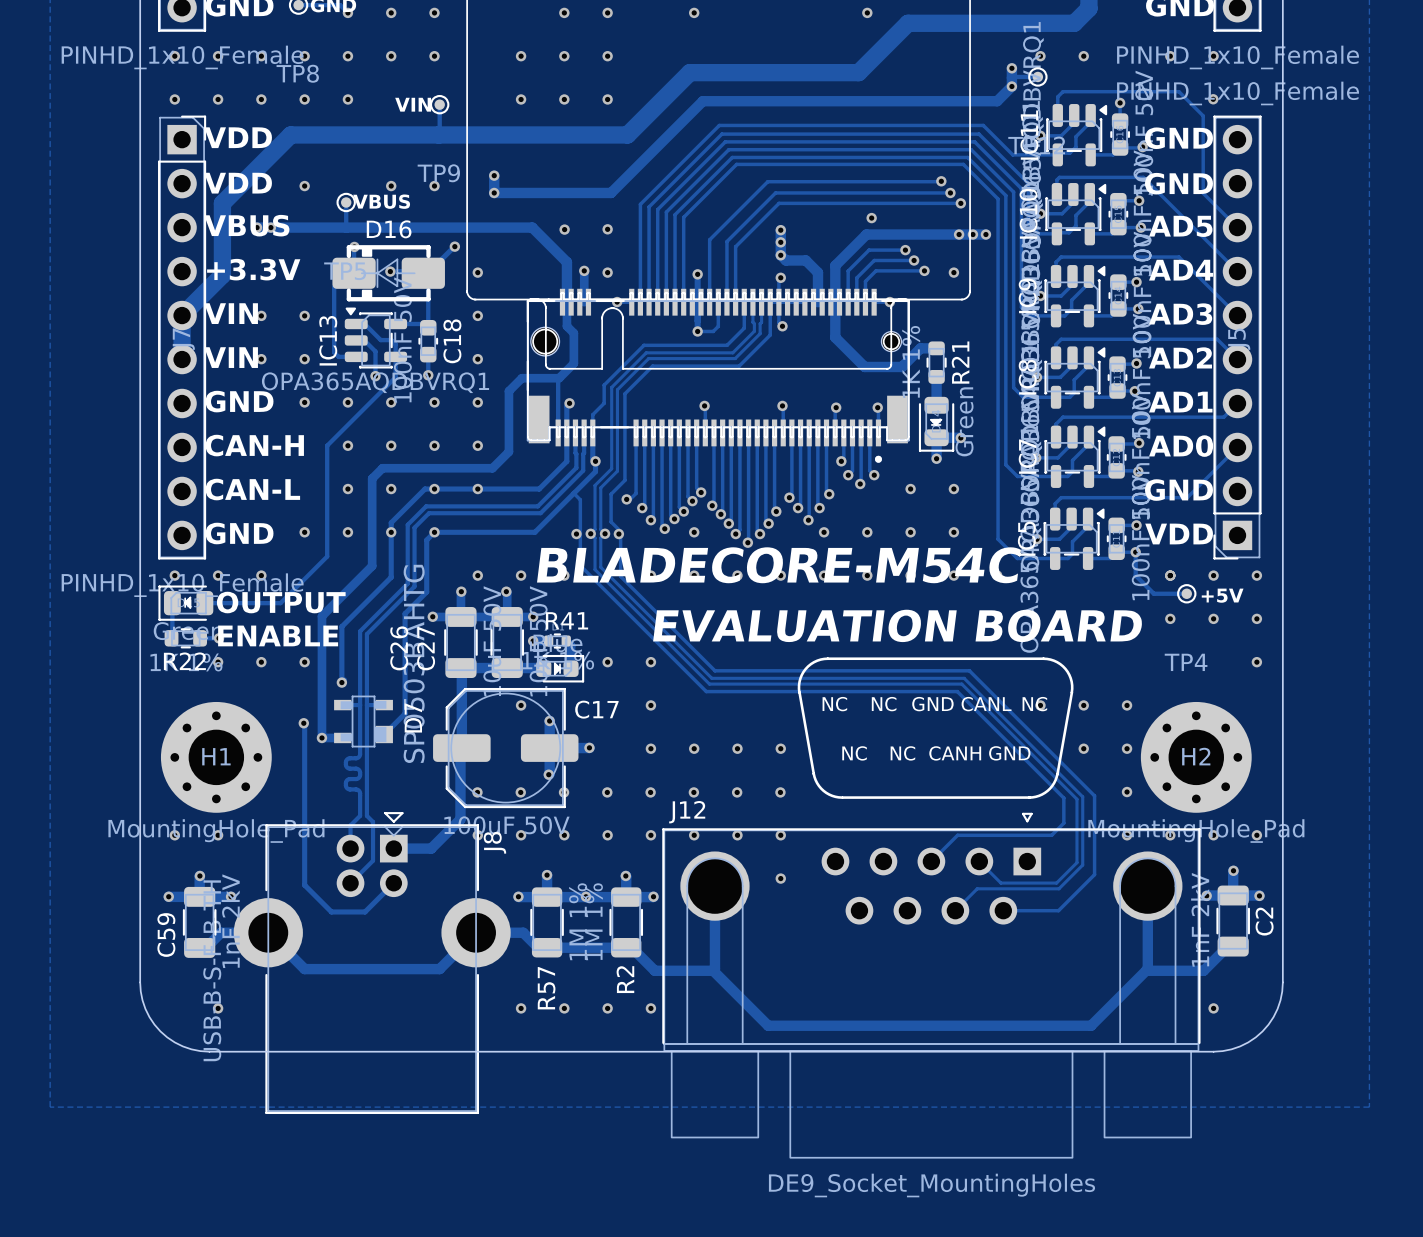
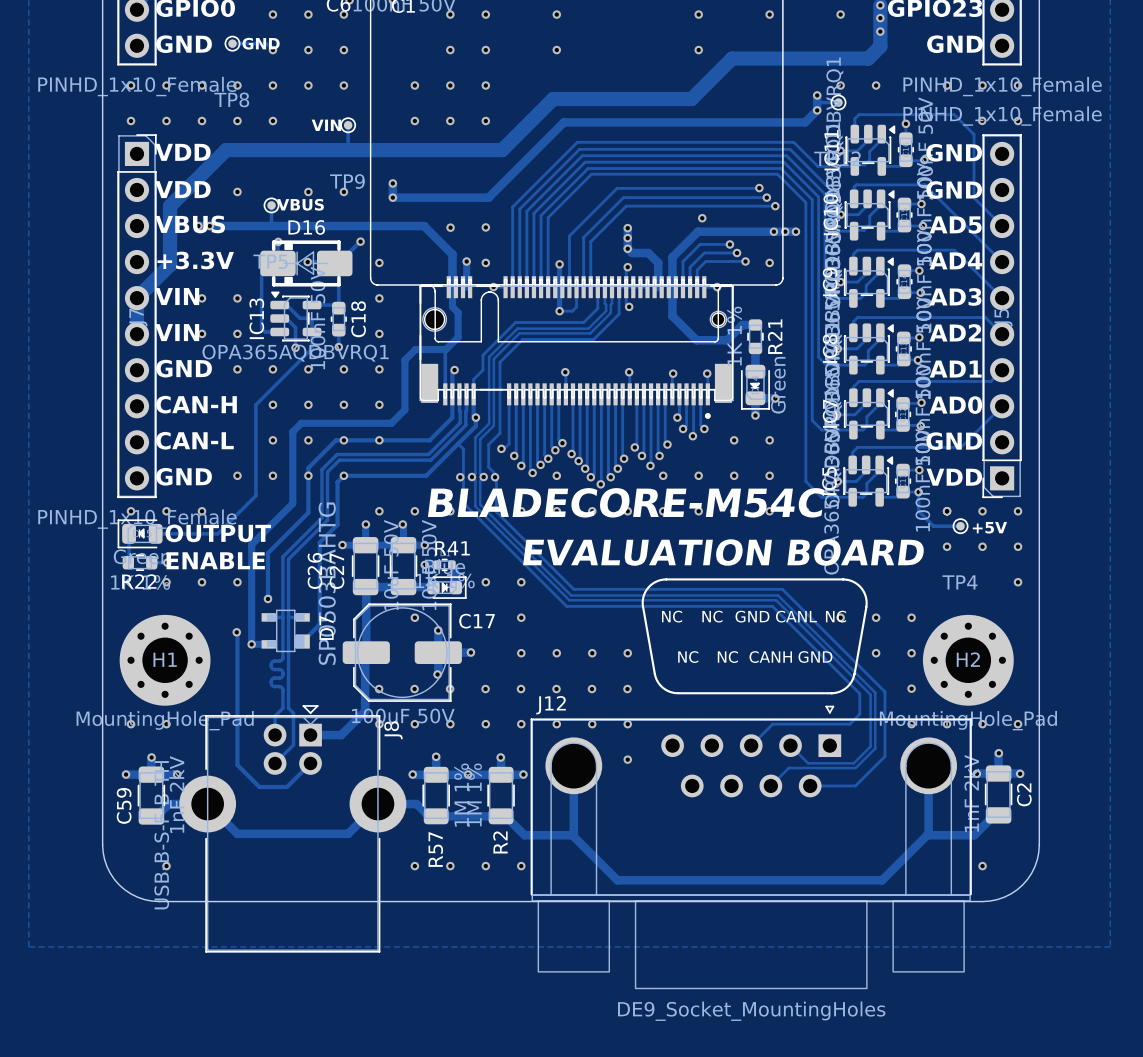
via: none -> (1018, 85)
via: none -> (1018, 121)

